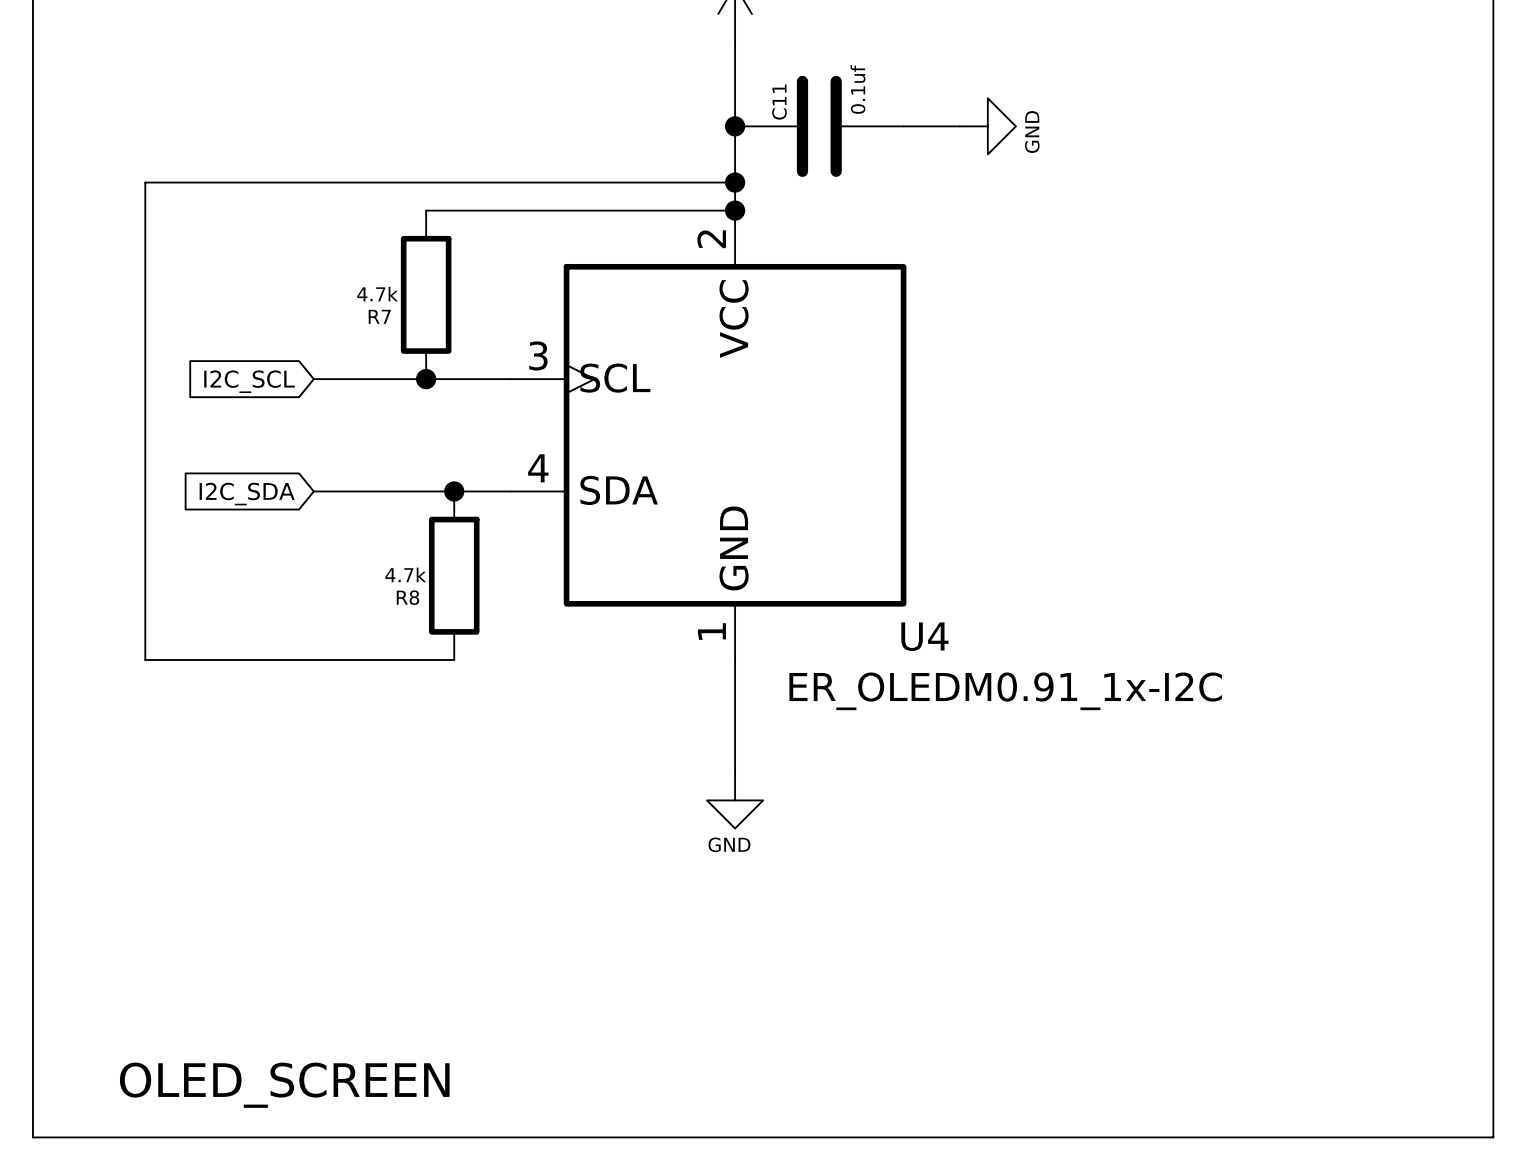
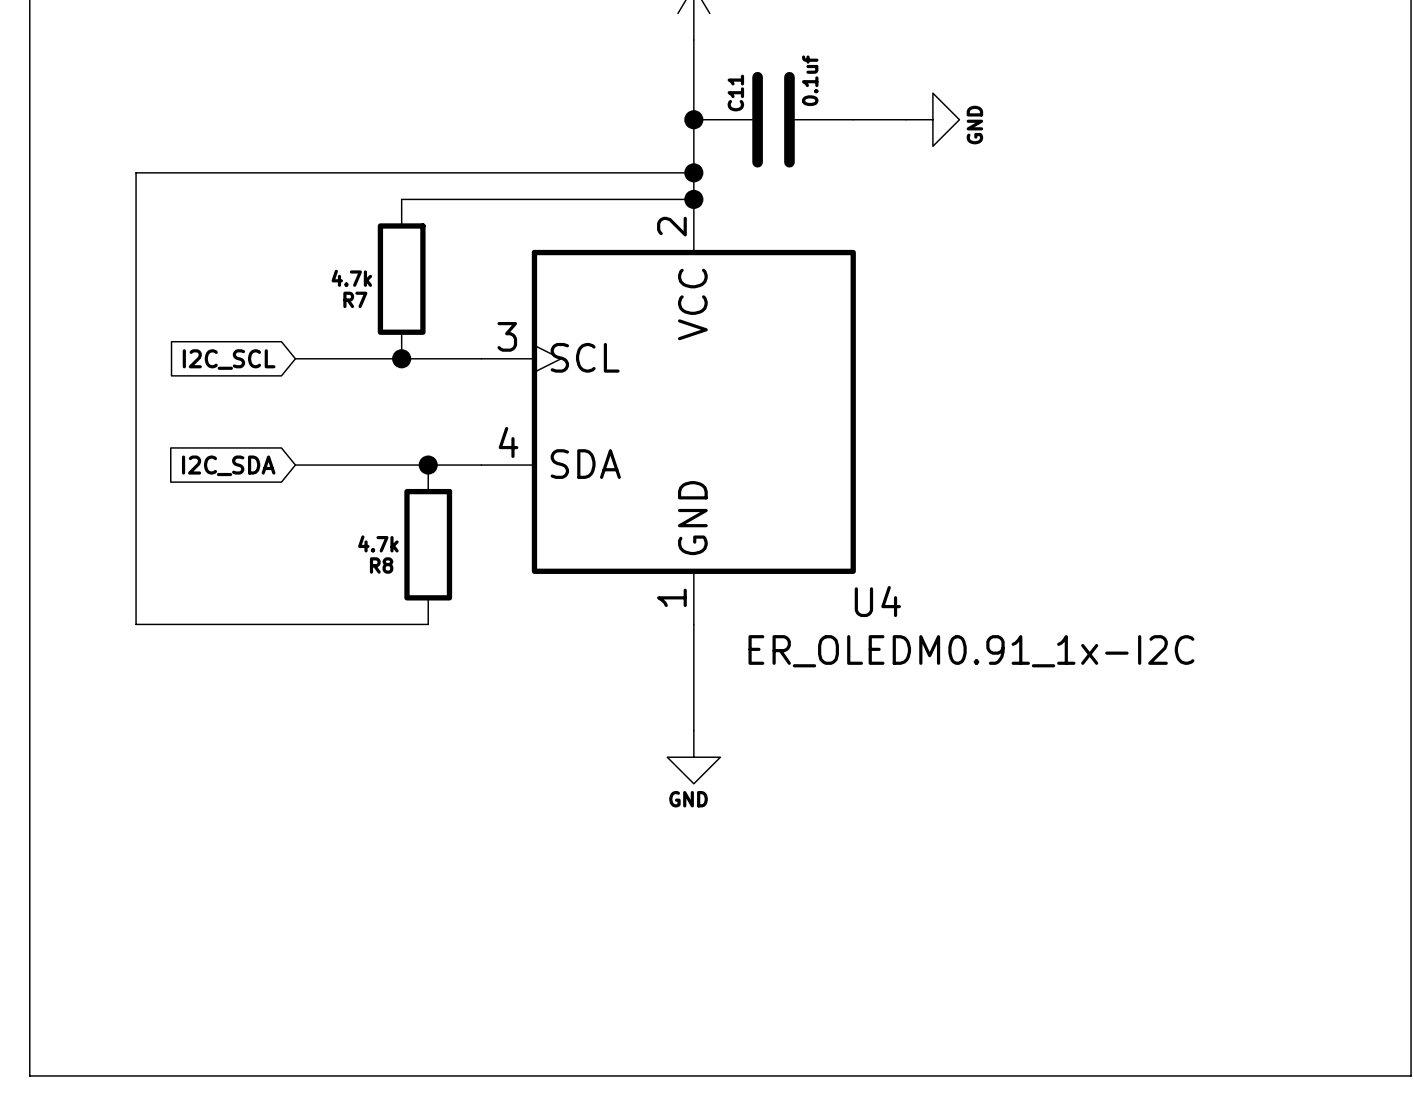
text: OLED_SCREEN (284, 1085) -> none

